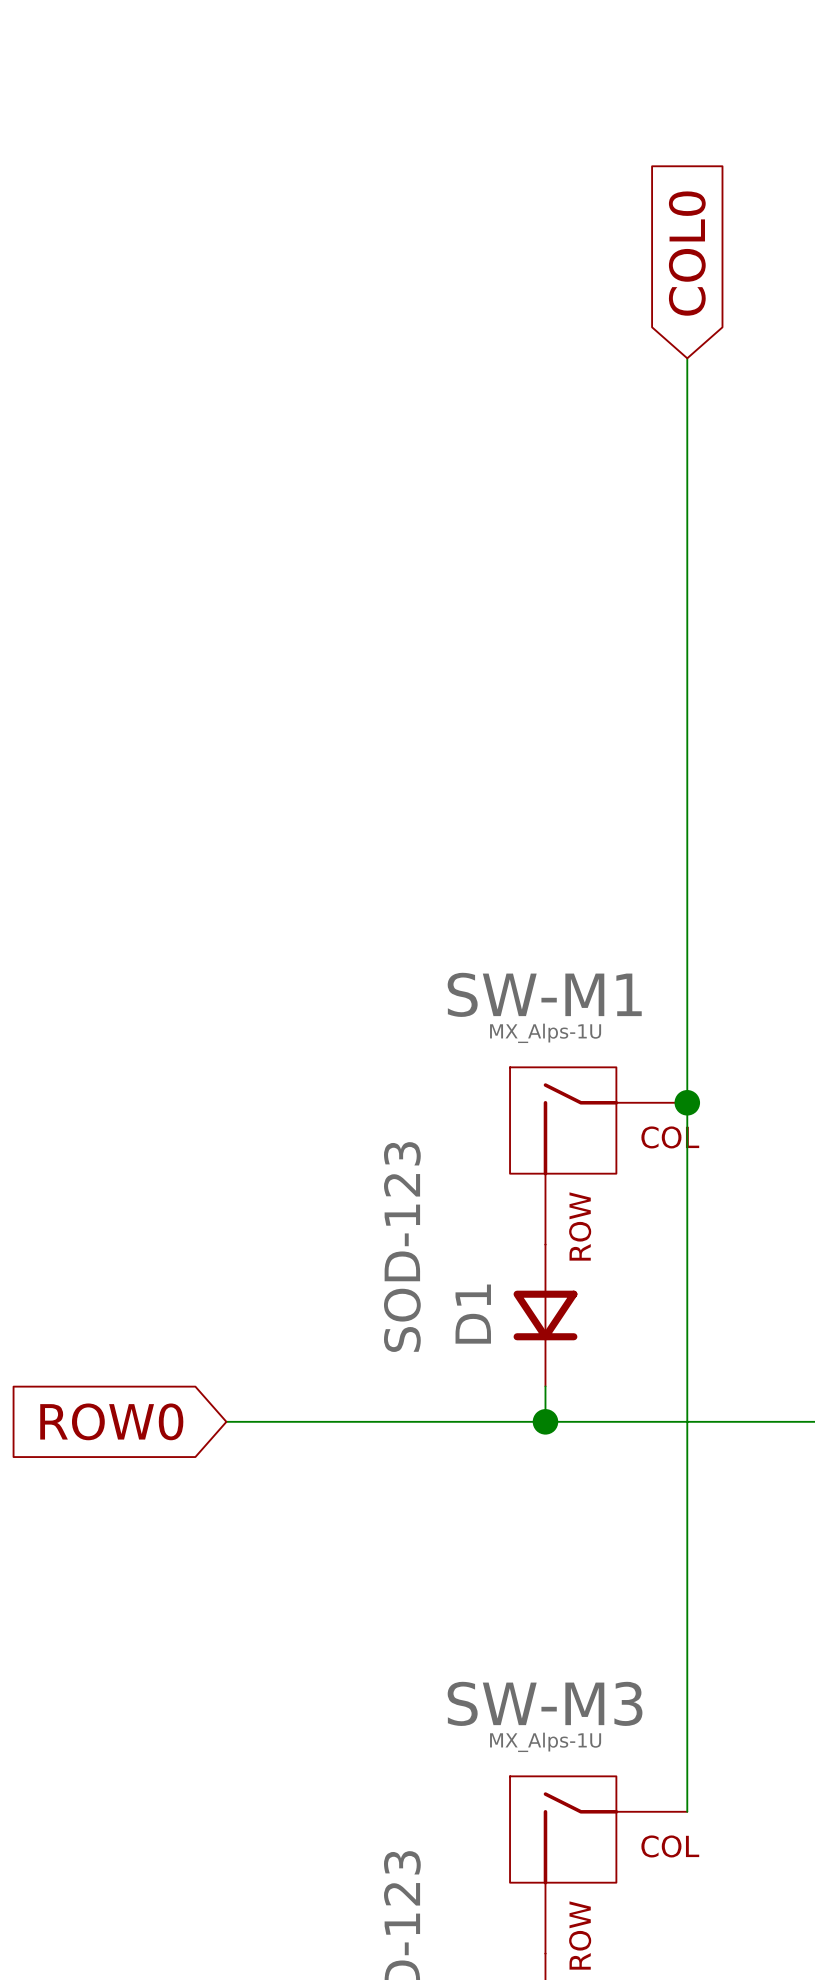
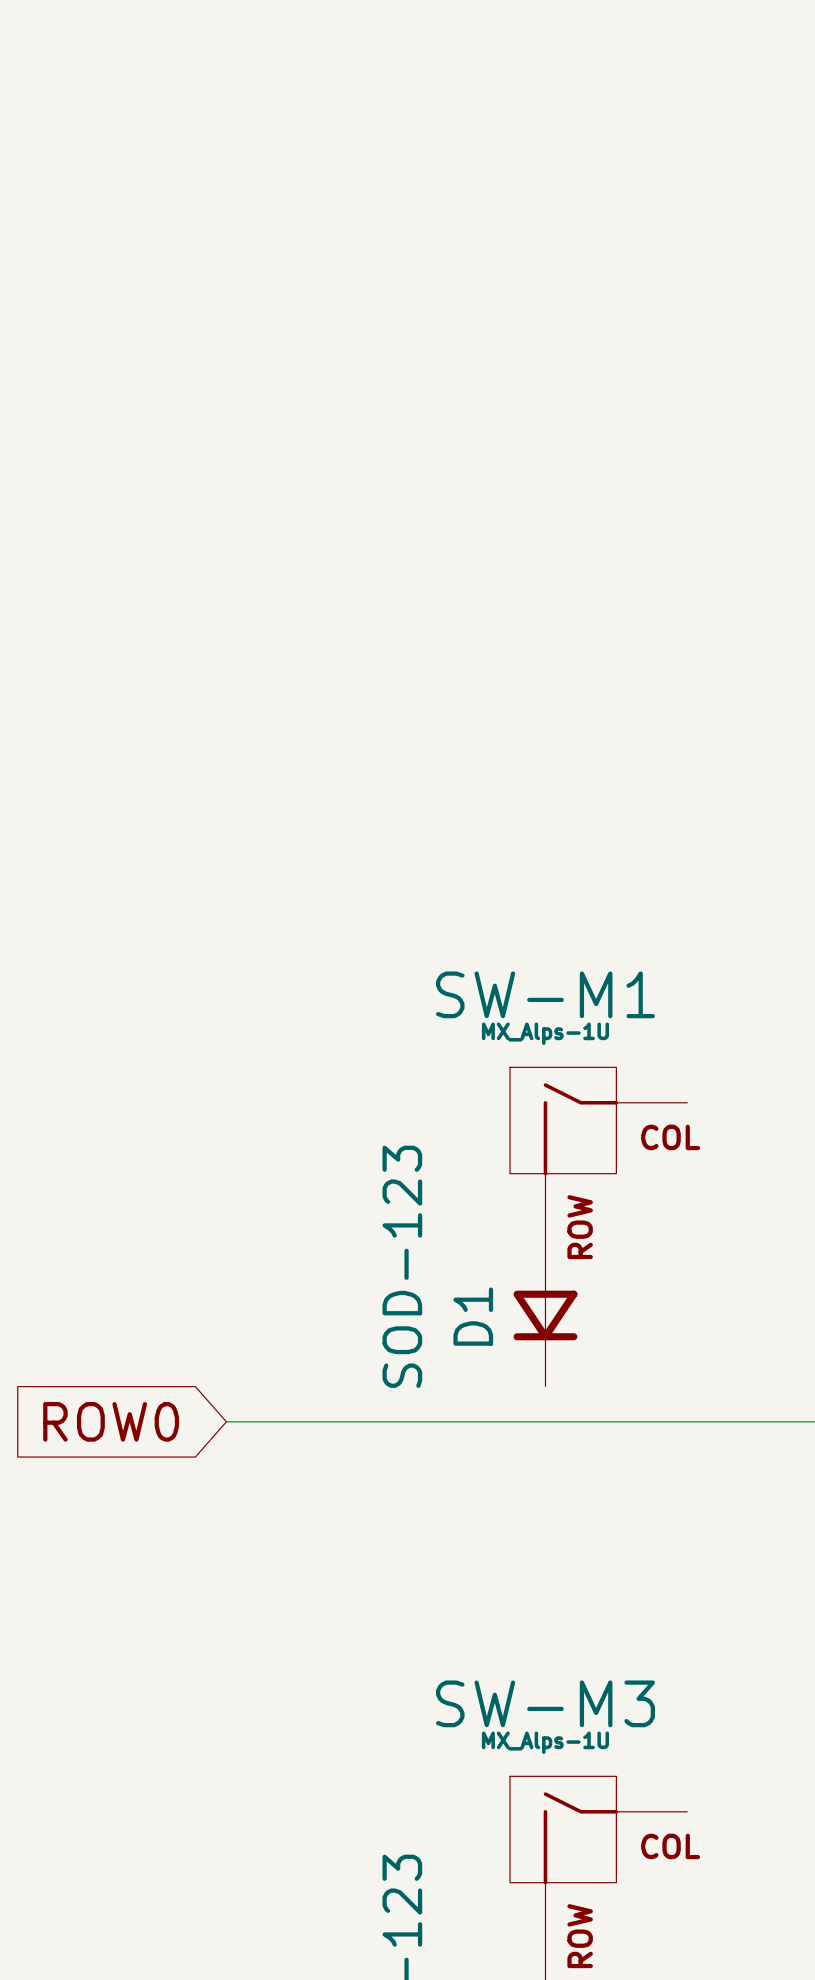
global label: COL0 (687, 253) -> none
wire: (687, 358) (687, 1811) -> none
junction: (687, 1102) -> none
wire: (545, 1386) (545, 1421) -> none
junction: (545, 1421) -> none

